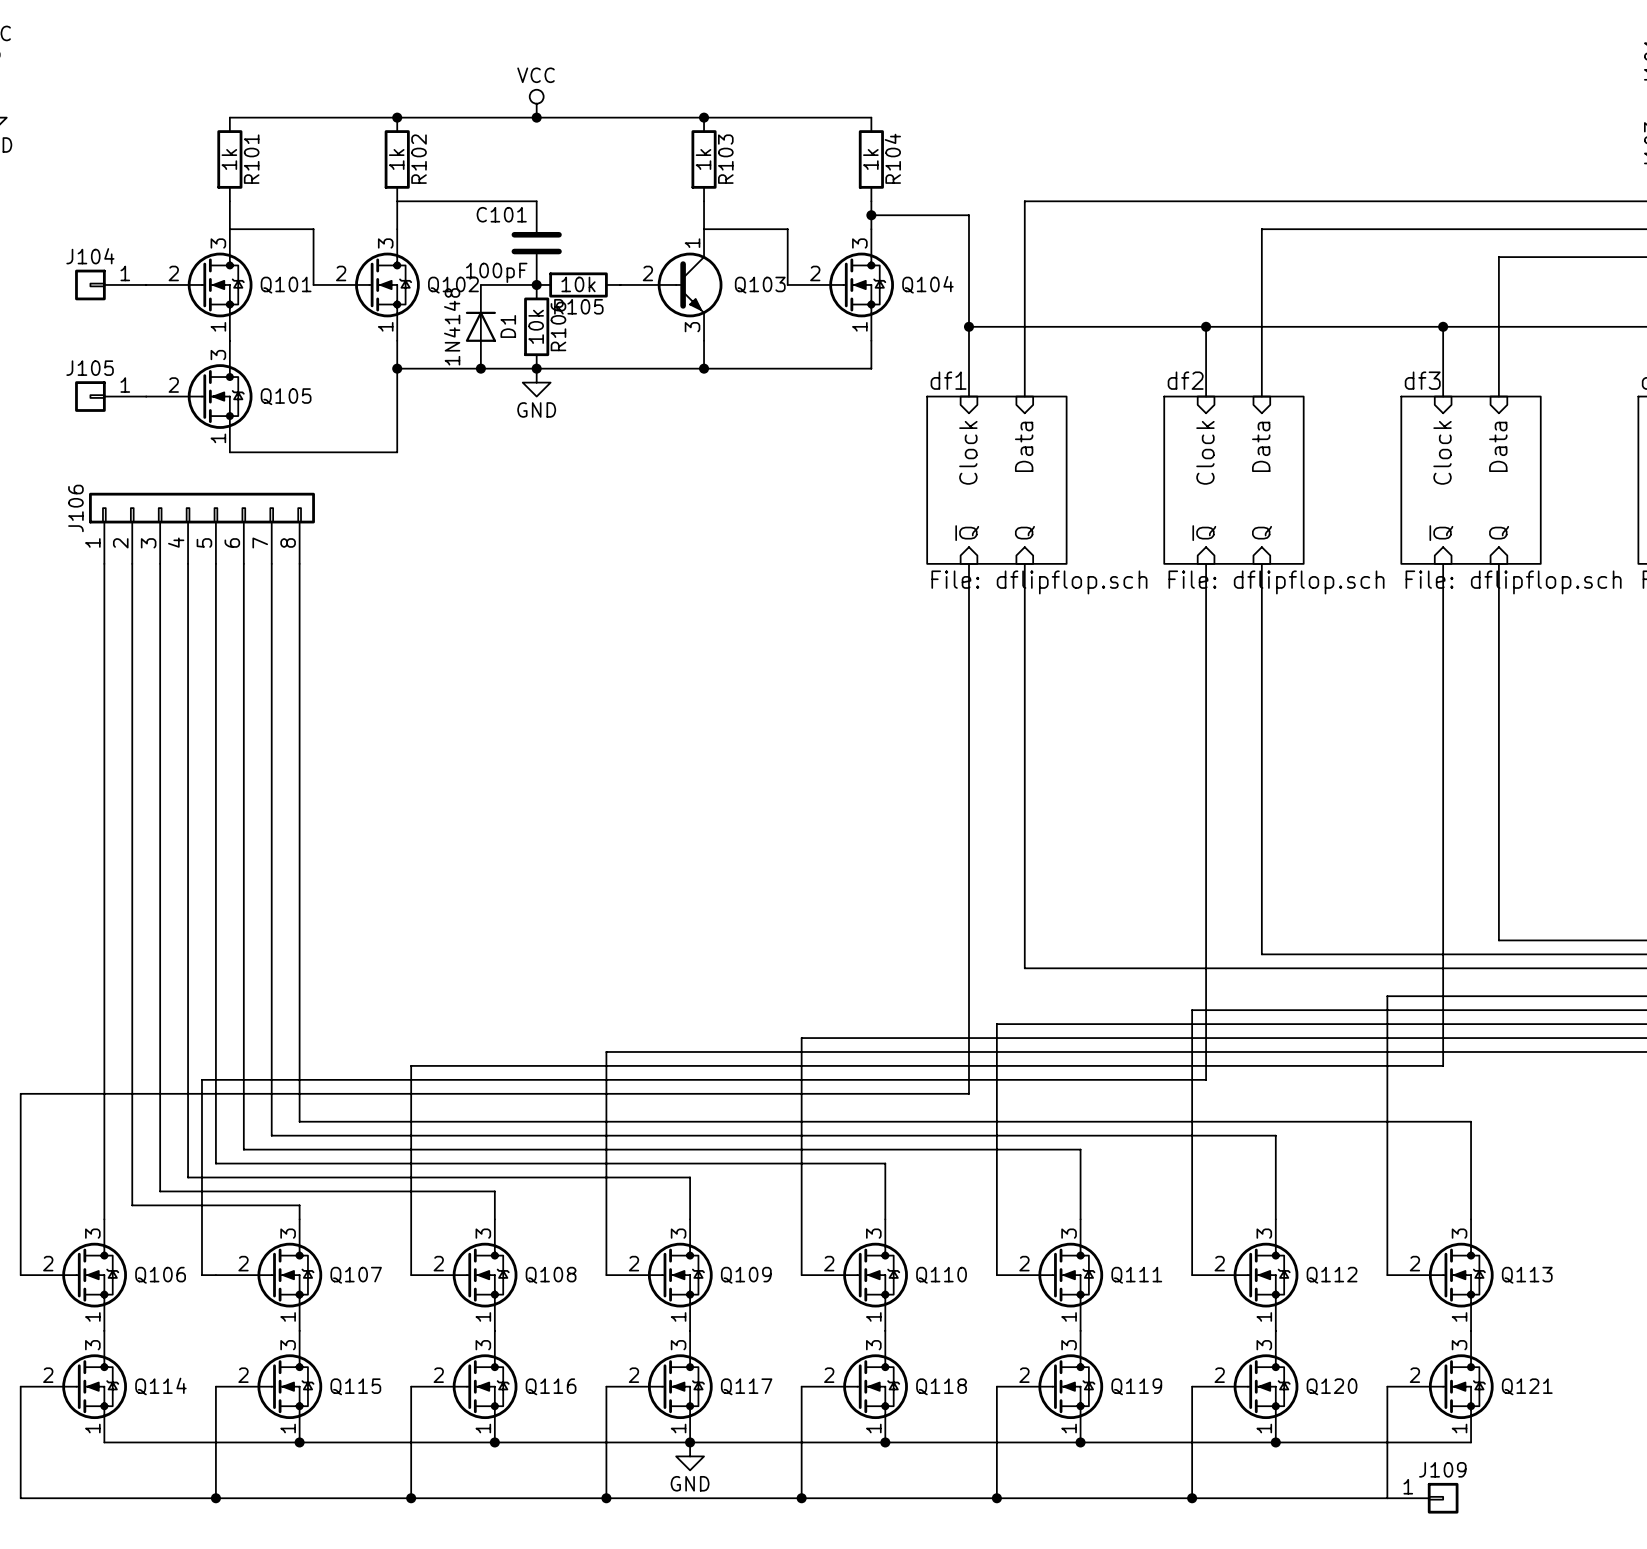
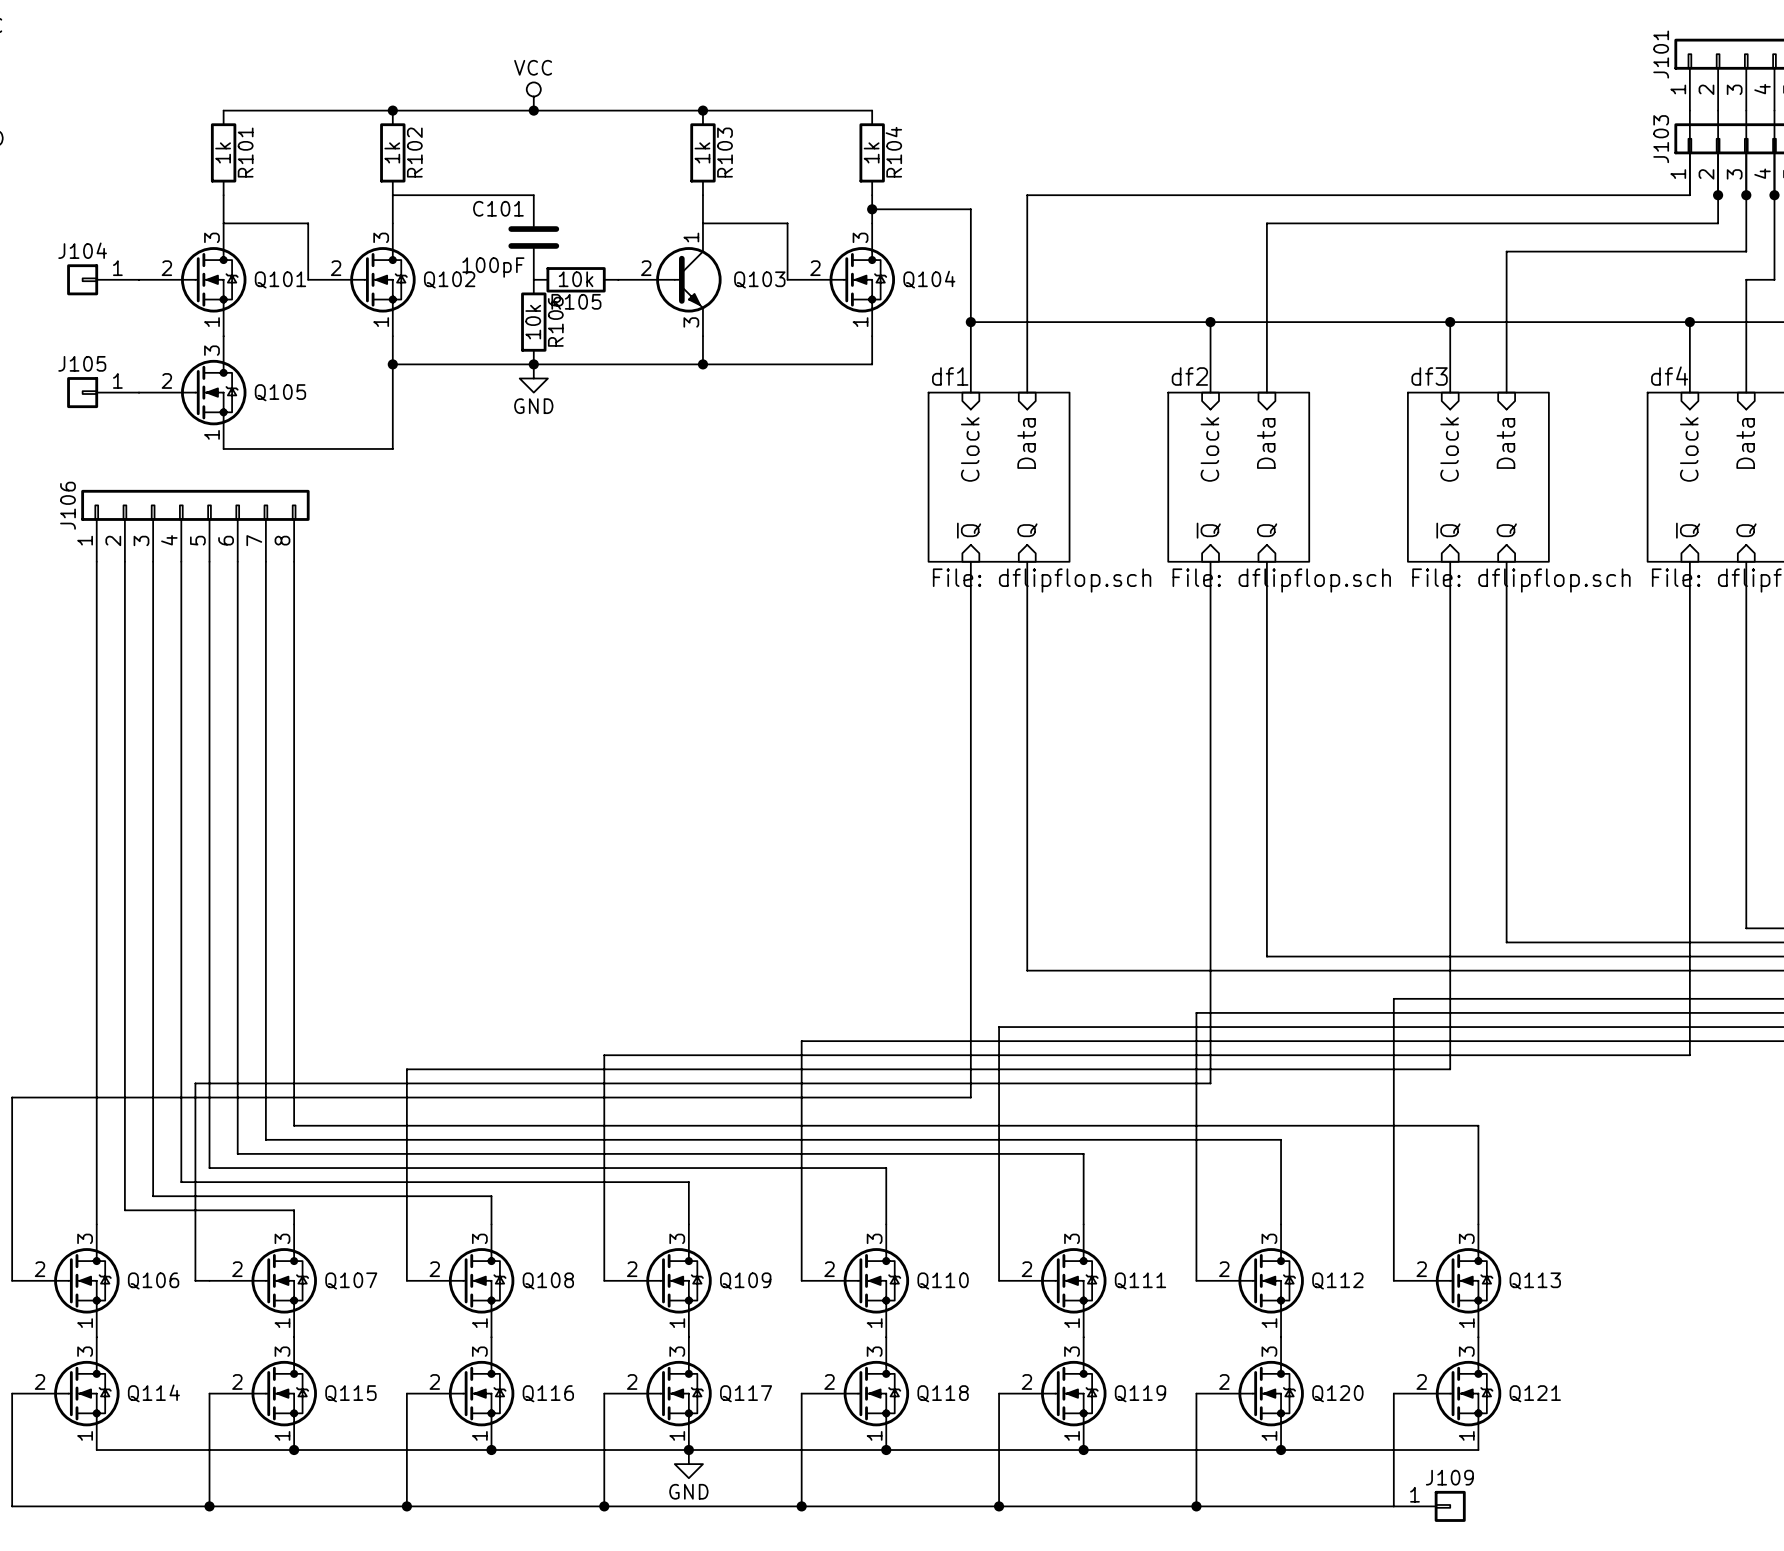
wire: (480, 284) (536, 284) -> none
junction: (536, 284) -> none
D1: 1N4148 (480, 326) -> none
junction: (480, 368) -> none

